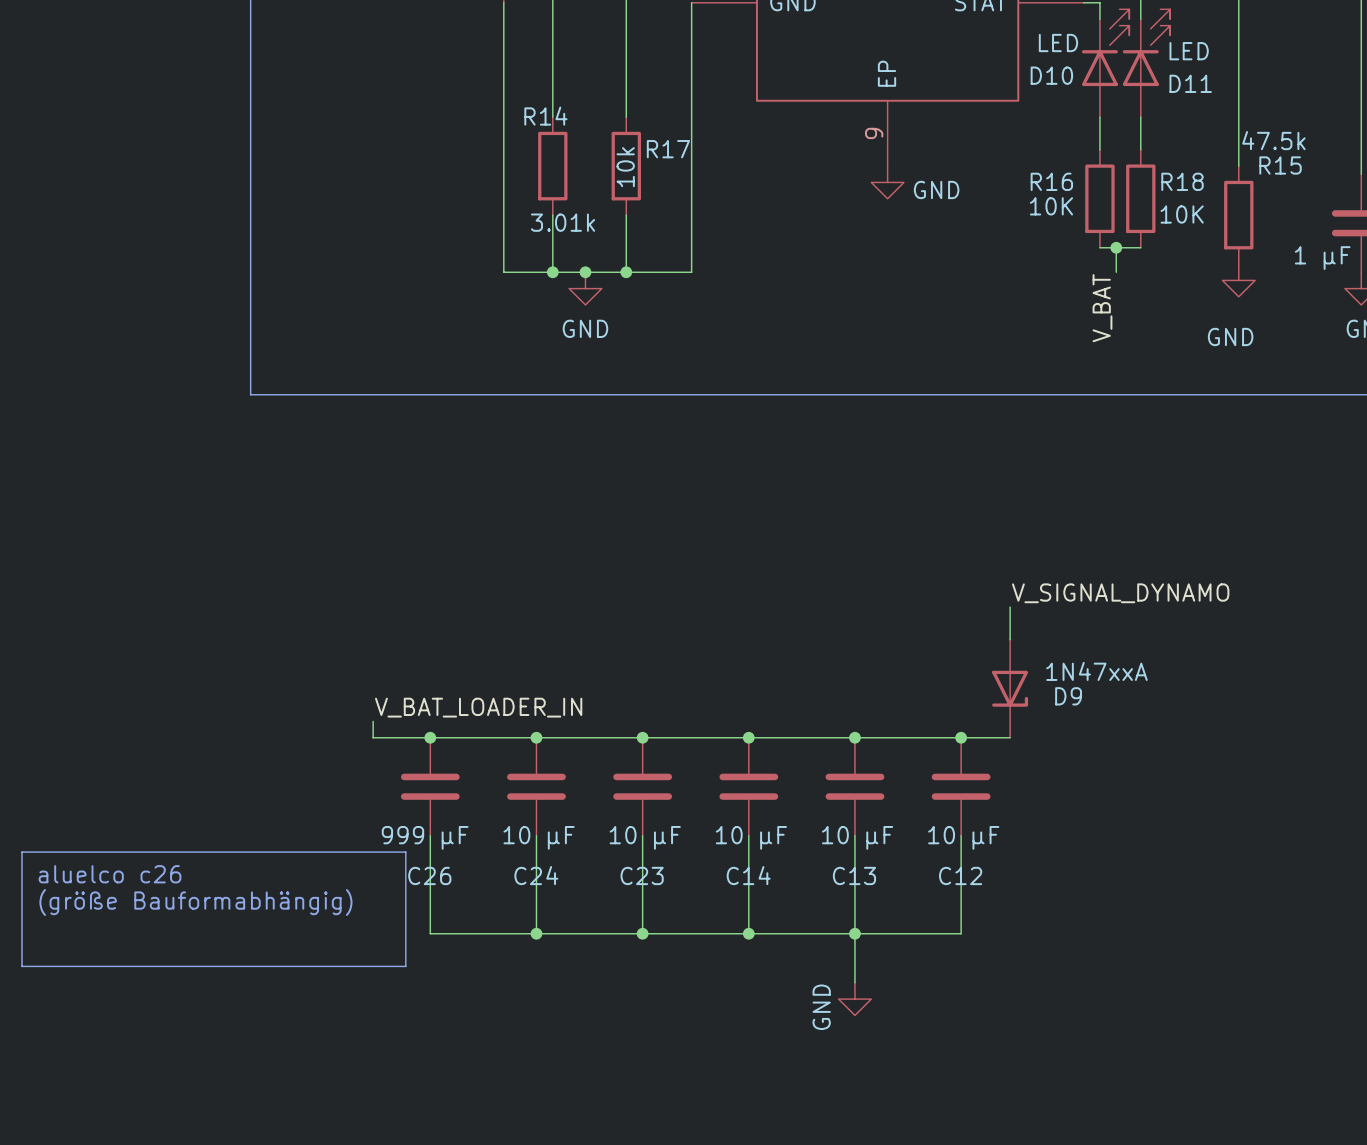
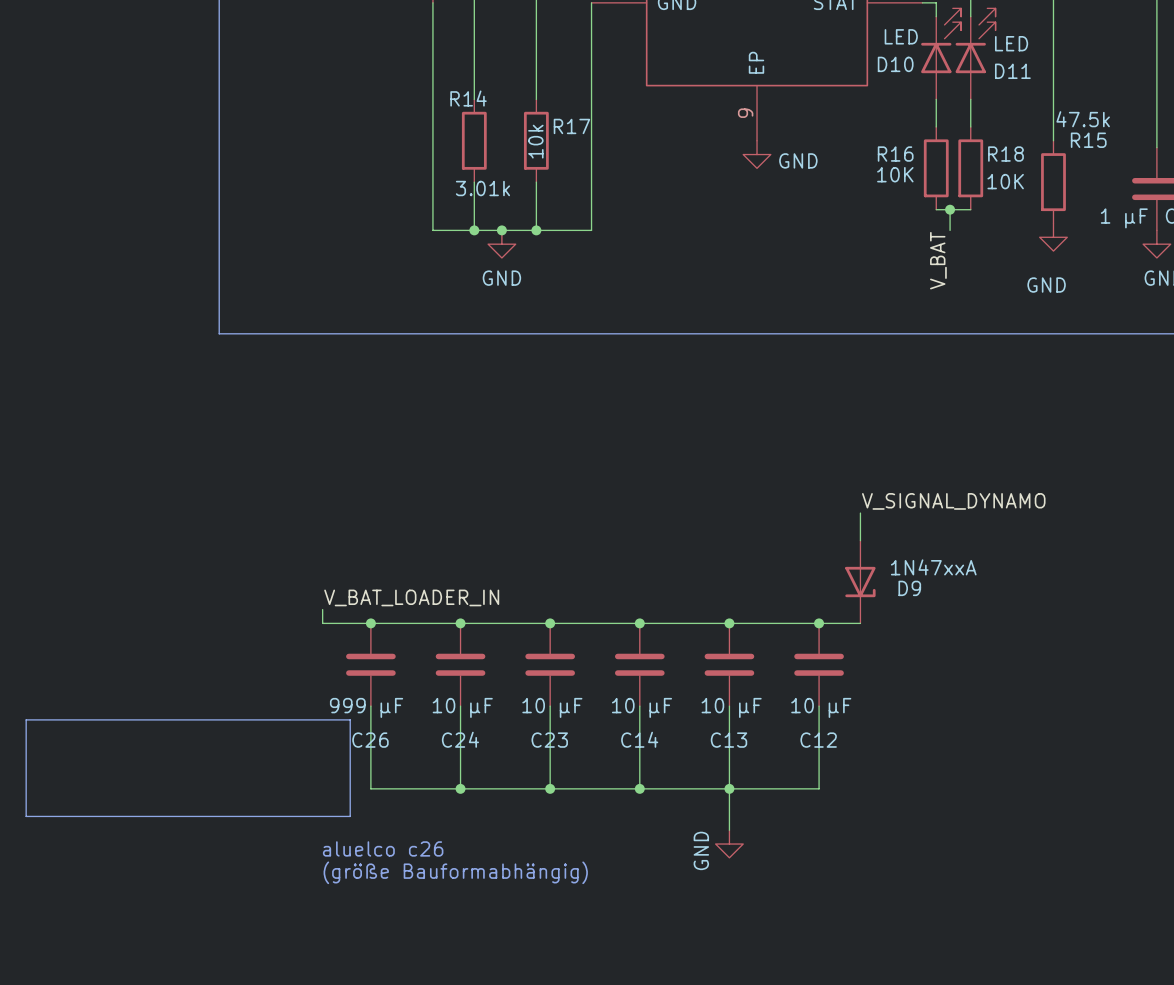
text: aluelco c26 (110, 874) -> none
text: (größe Bauformabhängig) (195, 902) -> none
text: none -> aluelco c26 (383, 848)
text: none -> (größe Bauformabhängig) (455, 872)

